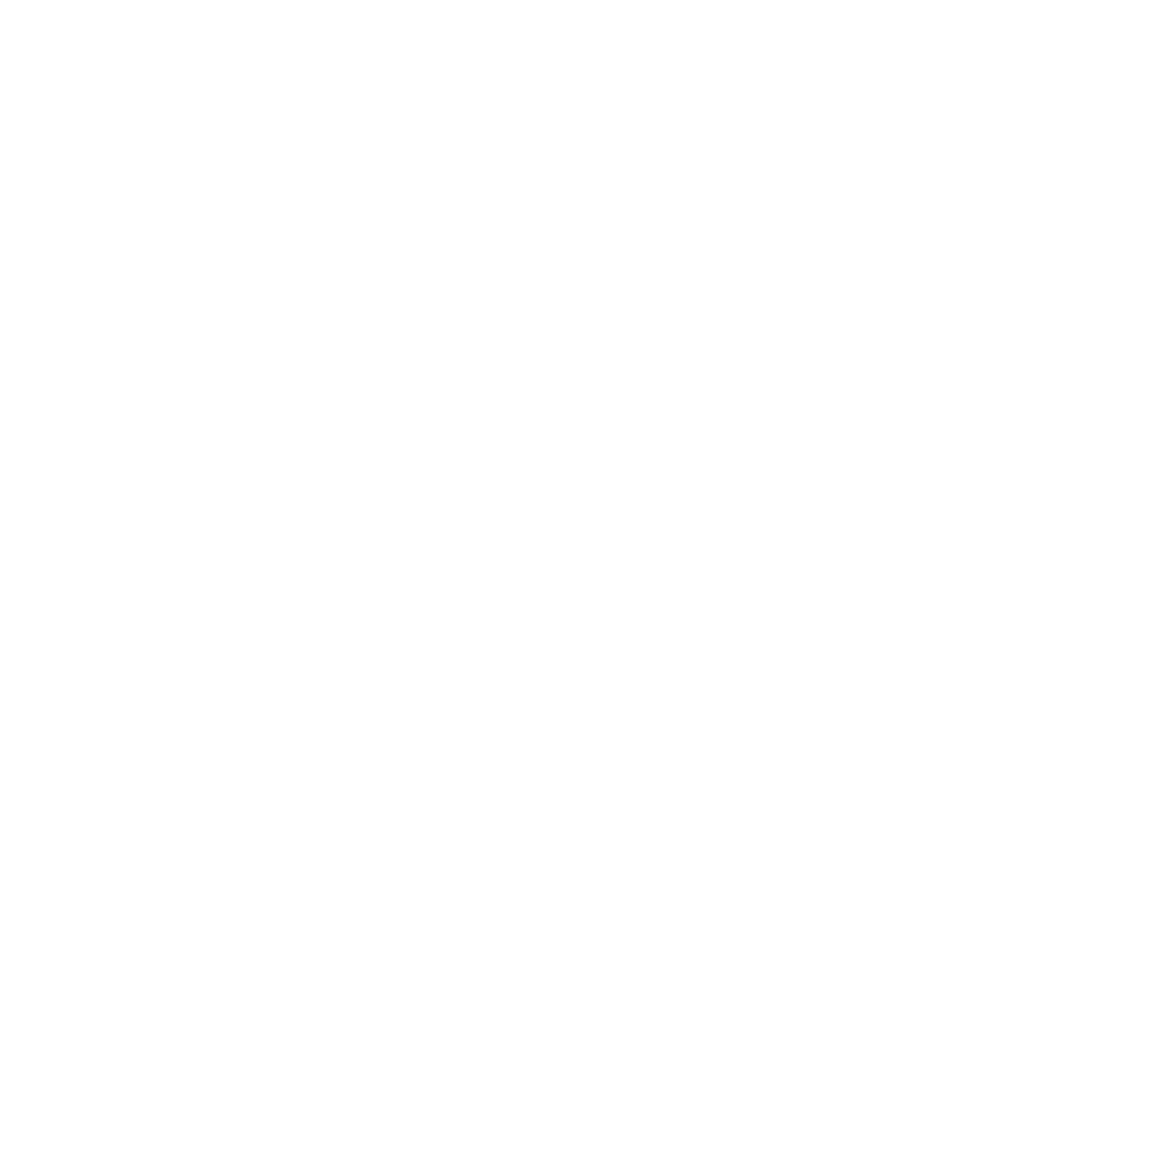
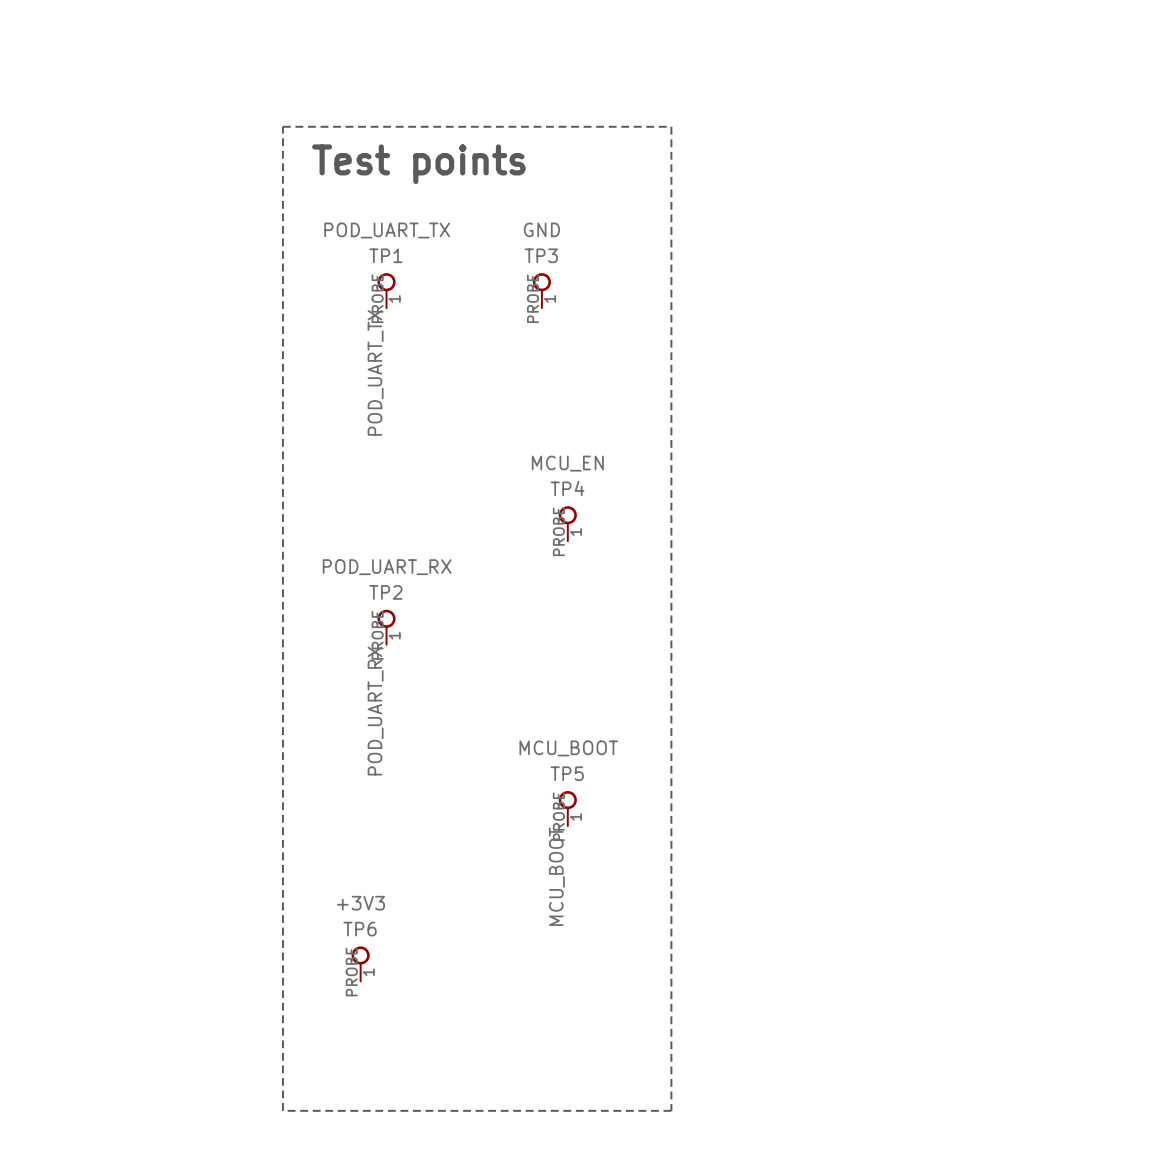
line: none -> (282, 126) (671, 126) (671, 1110) (282, 1110) (282, 126)
text: none -> Test points (418, 164)
TP1: none -> POD_UART_TX (386, 290)
TP3: none -> GND (541, 290)
label: none -> POD_UART_TX (375, 372)
TP4: none -> MCU_EN (567, 523)
TP2: none -> POD_UART_RX (386, 627)
label: none -> POD_UART_RX (375, 711)
TP5: none -> MCU_BOOT (567, 808)
label: none -> MCU_BOOT (556, 876)
TP6: none -> +3V3 (360, 963)

